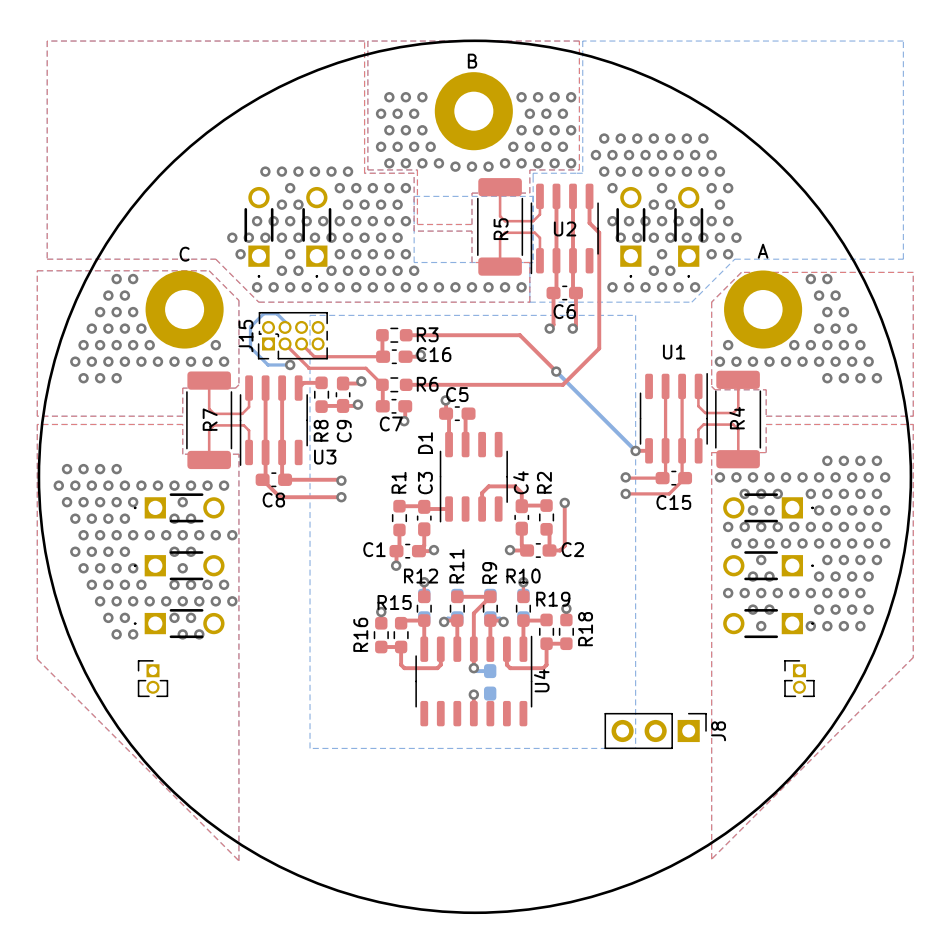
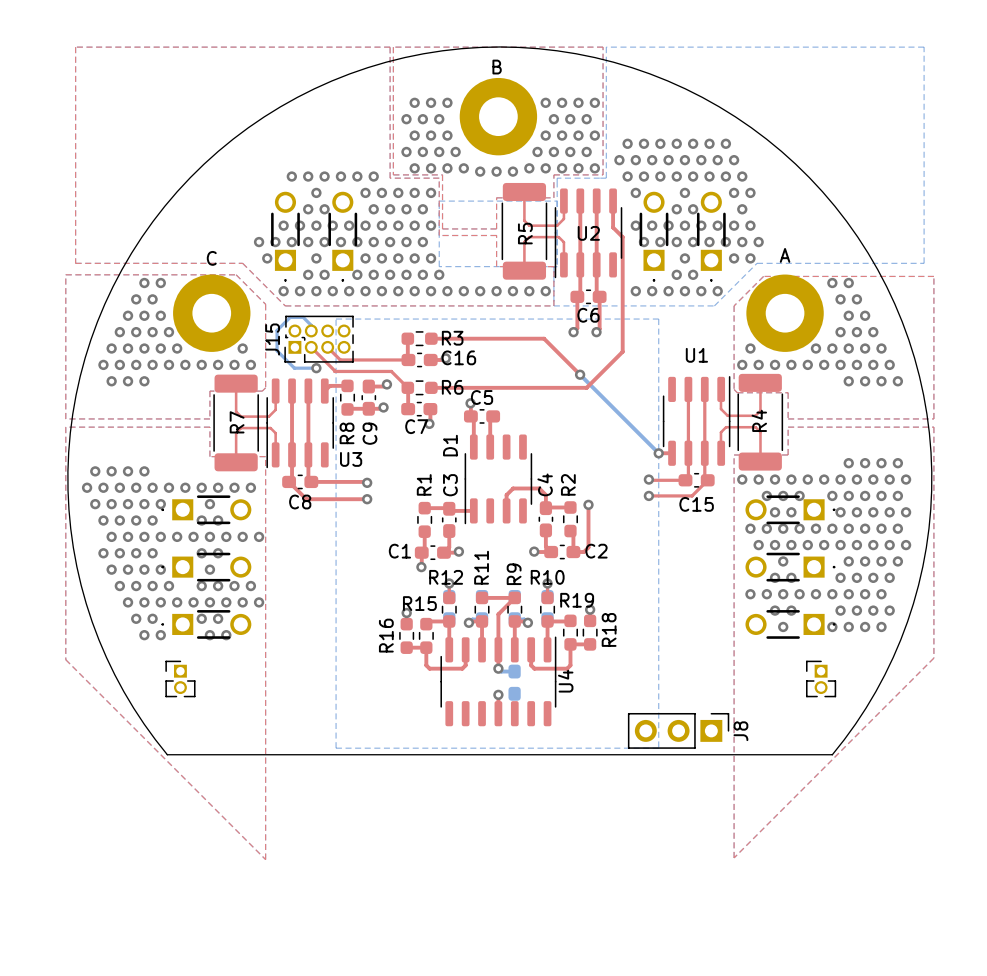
round board edge: [37, 39, 913, 915] -> none
board edge: none -> (167, 754) (832, 754) (855, 724) (875, 691) (893, 657) (907, 621) (918, 585) (926, 547) (930, 509) (931, 471) (929, 433) (923, 395) (908, 339) (894, 304) (877, 269) (857, 237) (834, 206) (809, 177) (766, 139) (735, 116) (702, 97) (667, 80) (631, 67) (576, 53) (538, 48) (499, 46) (461, 48) (404, 57) (367, 67) (314, 88) (280, 106) (248, 127) (218, 151) (190, 177) (164, 206) (141, 237) (121, 269) (104, 304) (85, 357) (76, 395) (70, 433) (67, 471) (68, 509) (73, 547) (86, 603) (106, 657) (123, 691) (144, 724) (167, 754)

